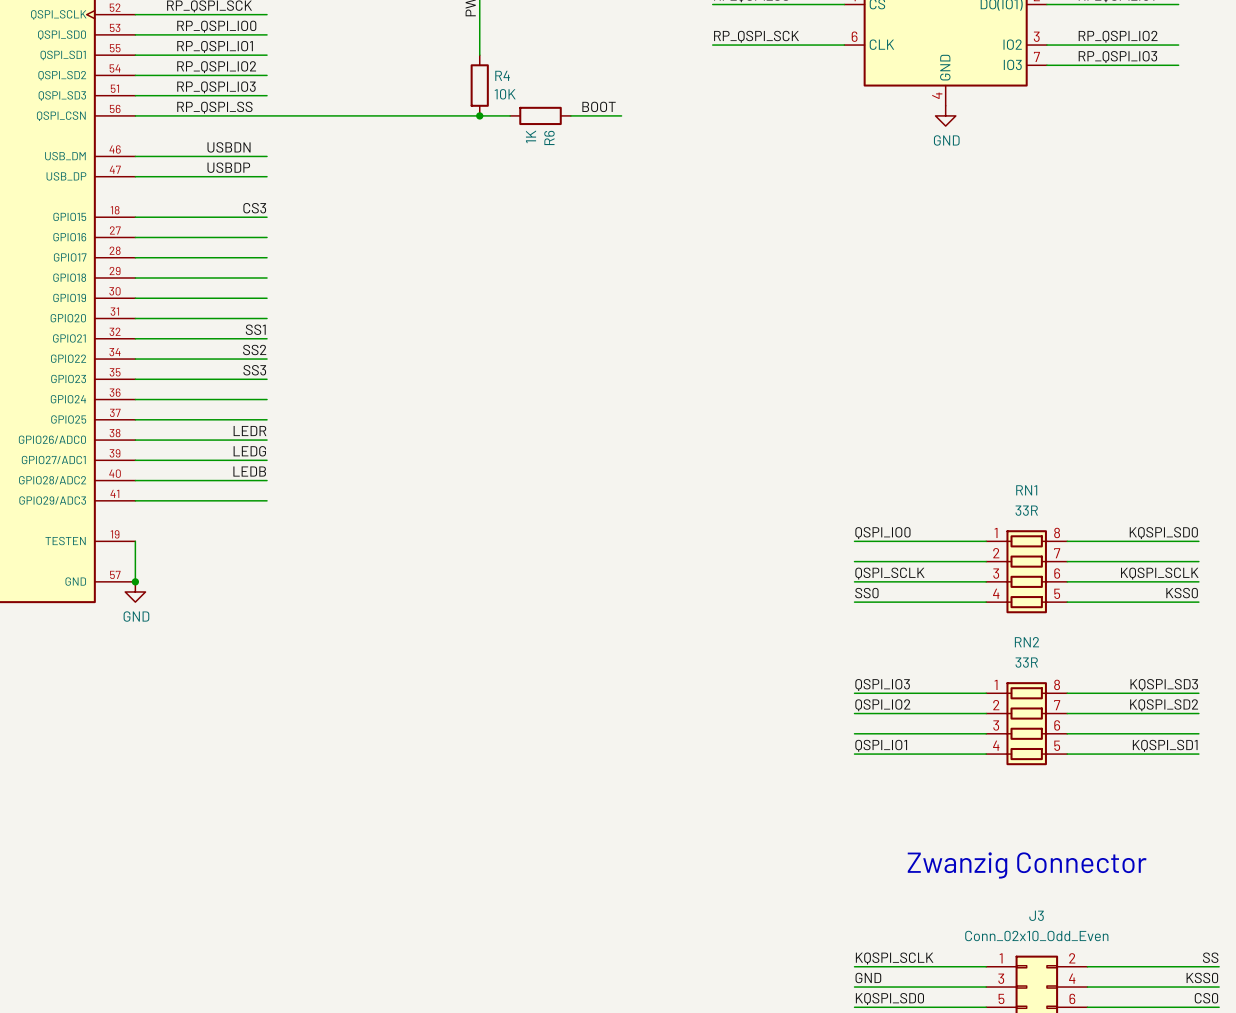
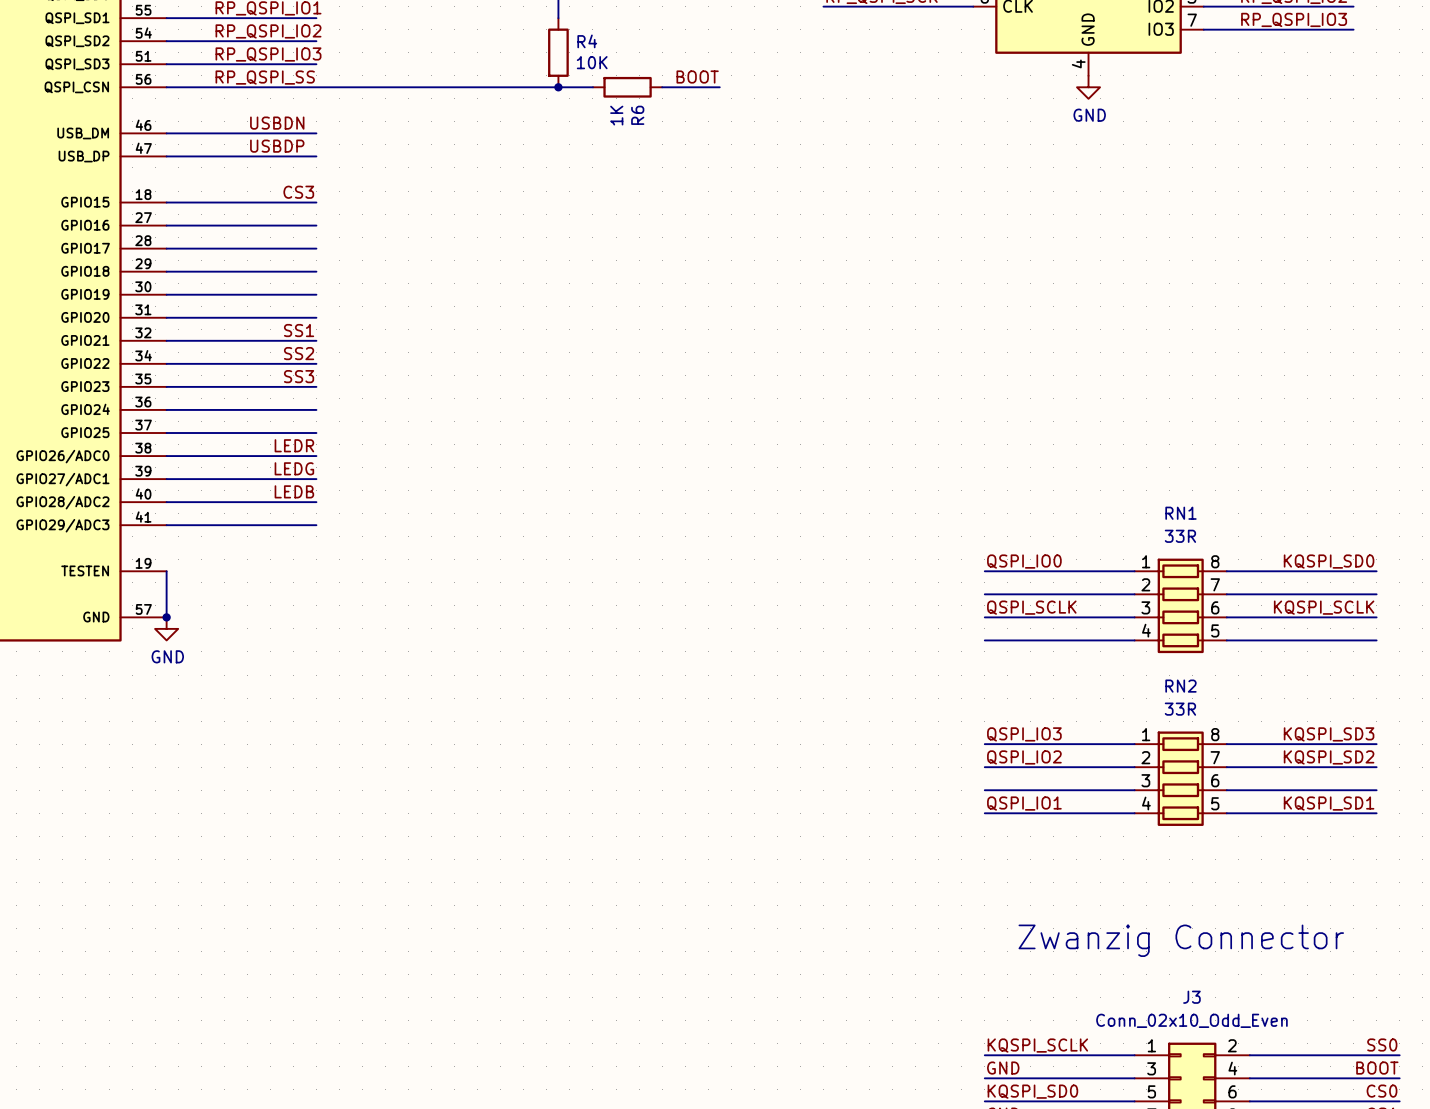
label: SS0 (866, 593) -> none
label: KSS0 (1182, 593) -> none
label: SS (1210, 957) -> SS0 (1382, 1045)
label: KSS0 (1202, 977) -> BOOT (1377, 1068)

